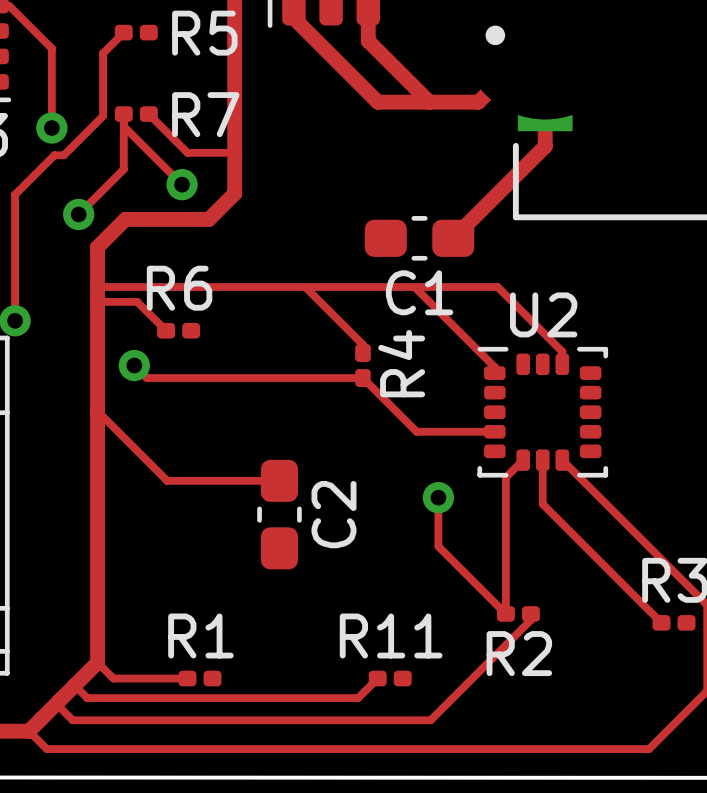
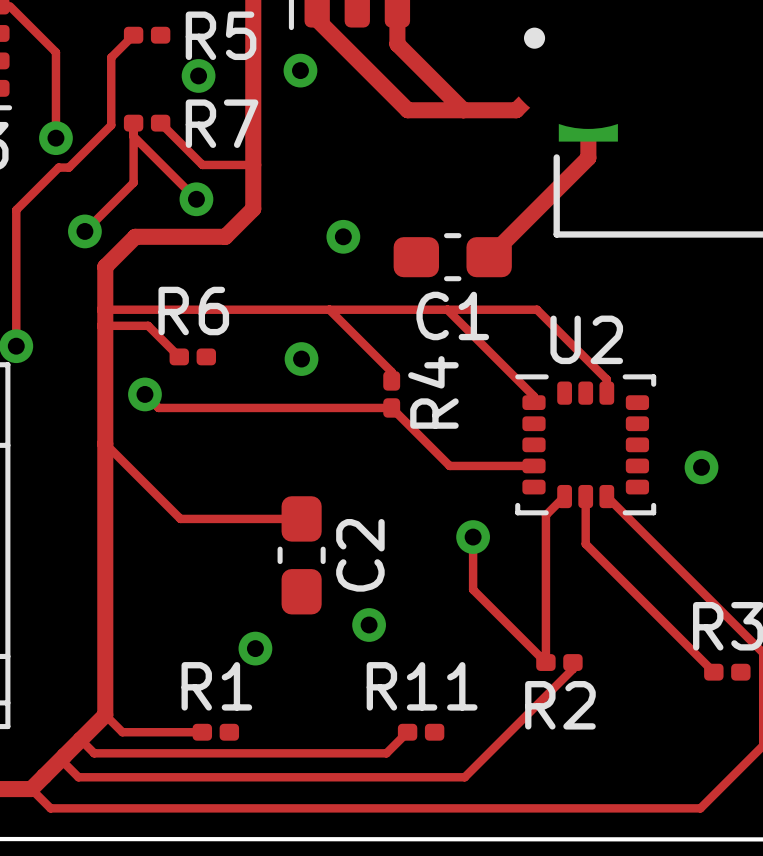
via: none -> (300, 70)
via: none -> (198, 75)
via: none -> (343, 236)
via: none -> (301, 359)
via: none -> (701, 467)
via: none -> (369, 625)
via: none -> (255, 648)

